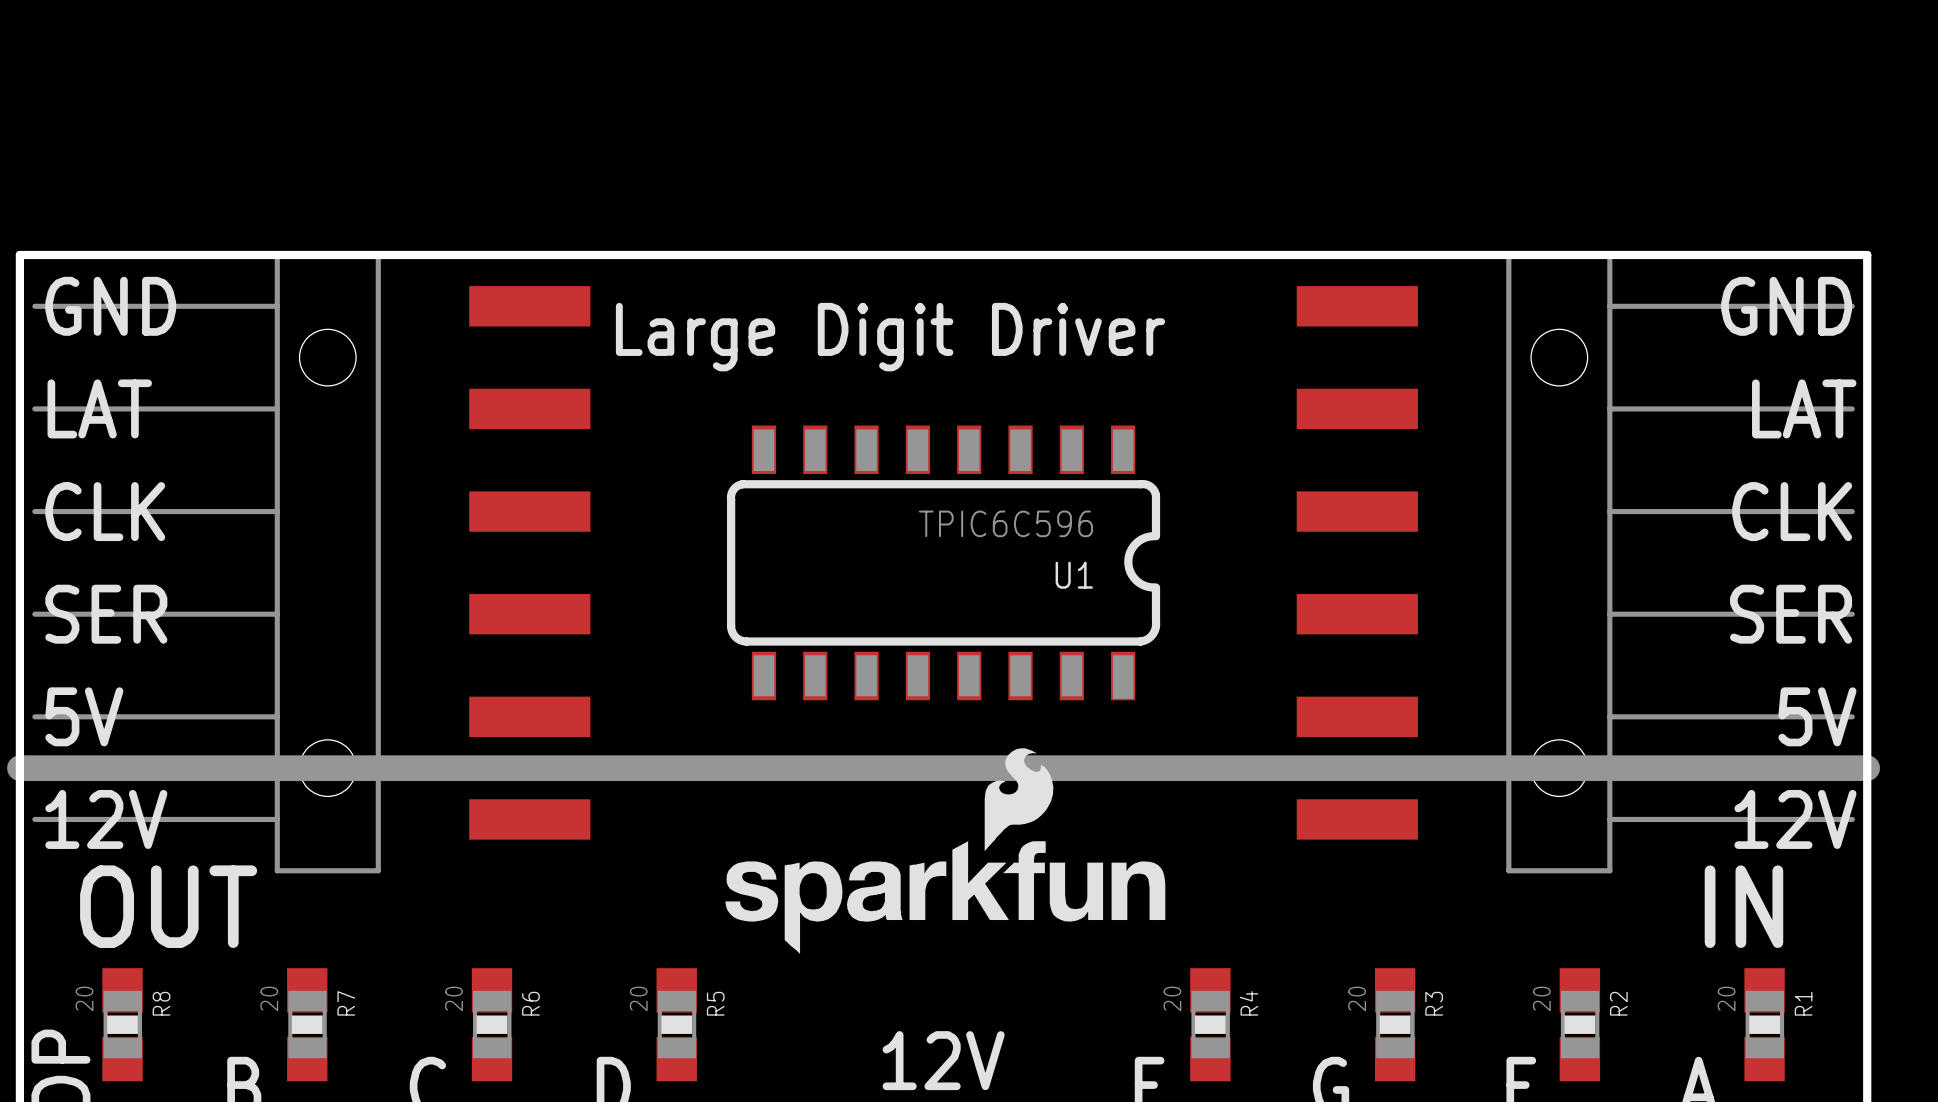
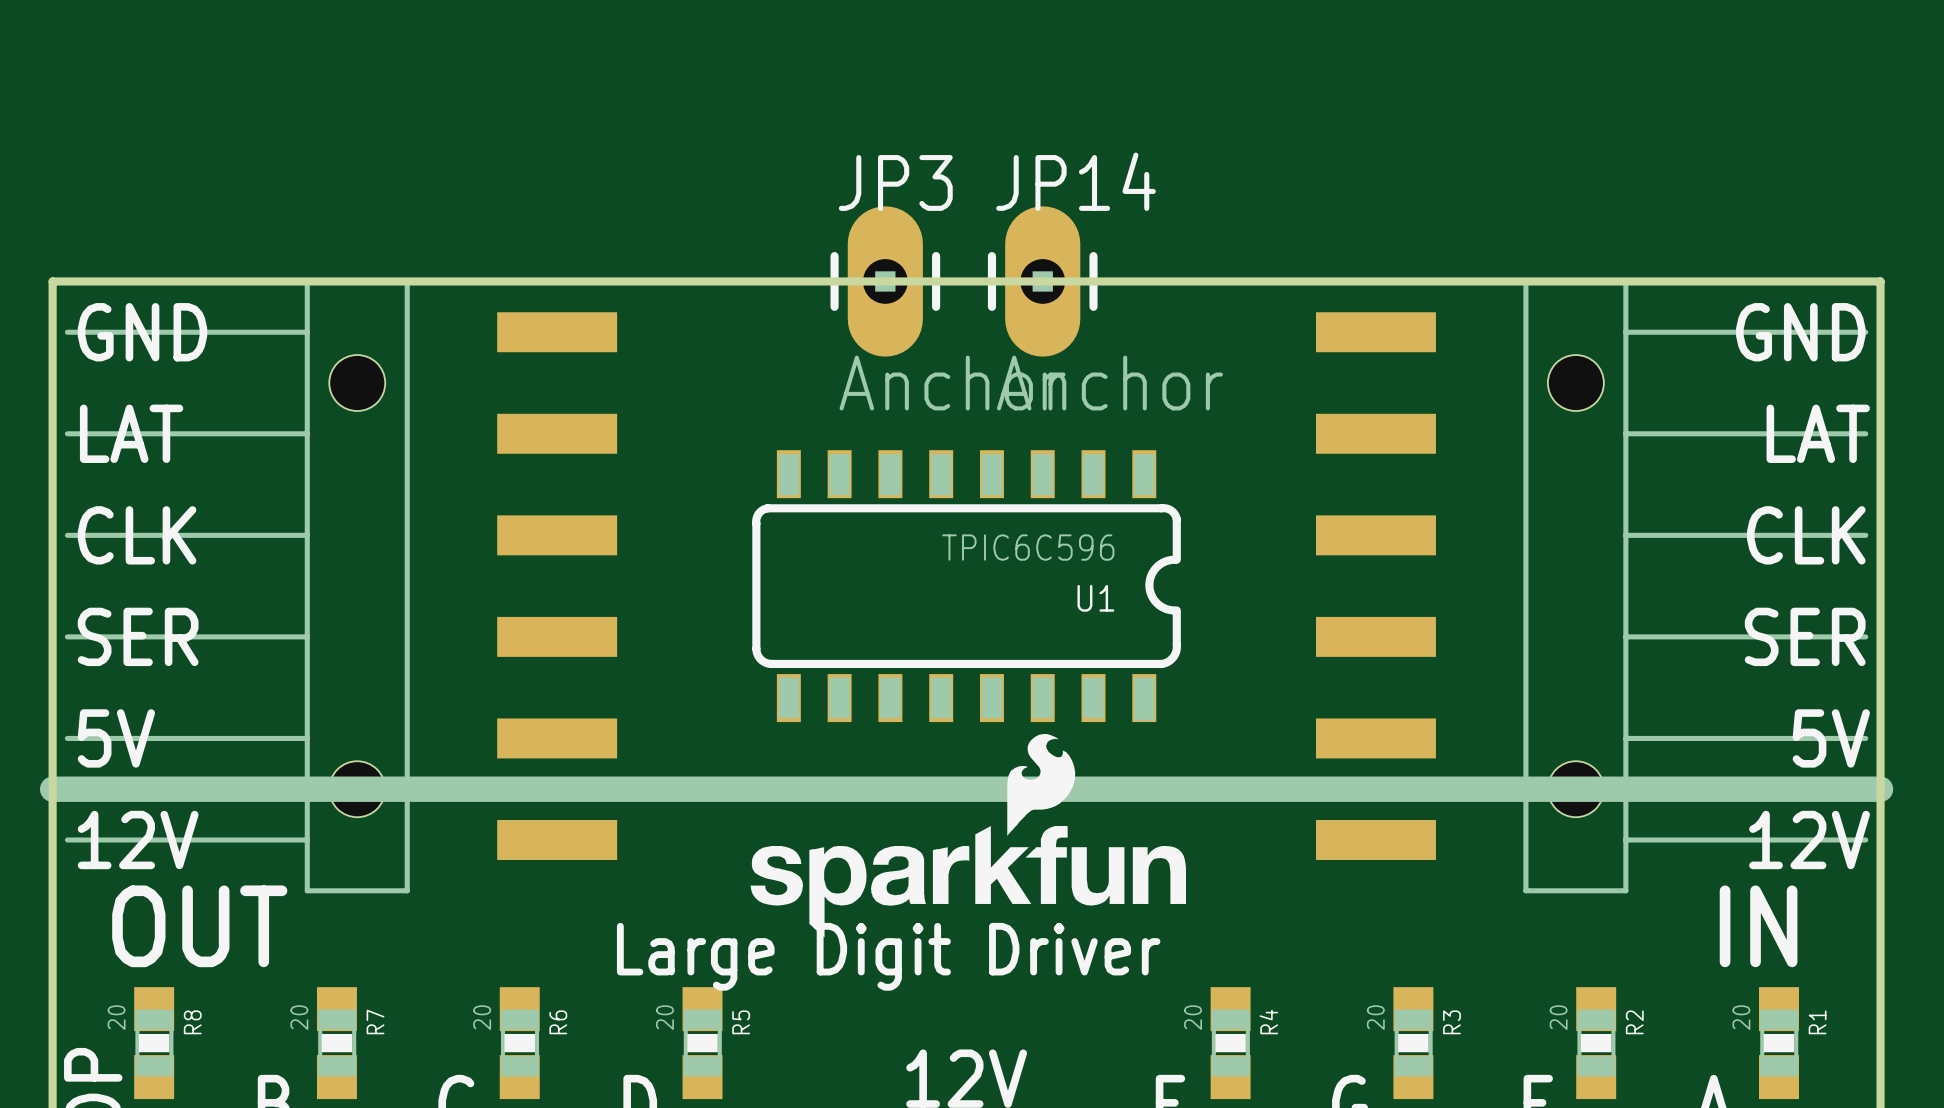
JP3: none -> Anchor (885, 281)
JP14: none -> Anchor (1042, 281)
text position: Large Digit Driver (890, 337) -> Large Digit Driver (888, 956)
drawing position: (945, 851) -> (968, 835)

